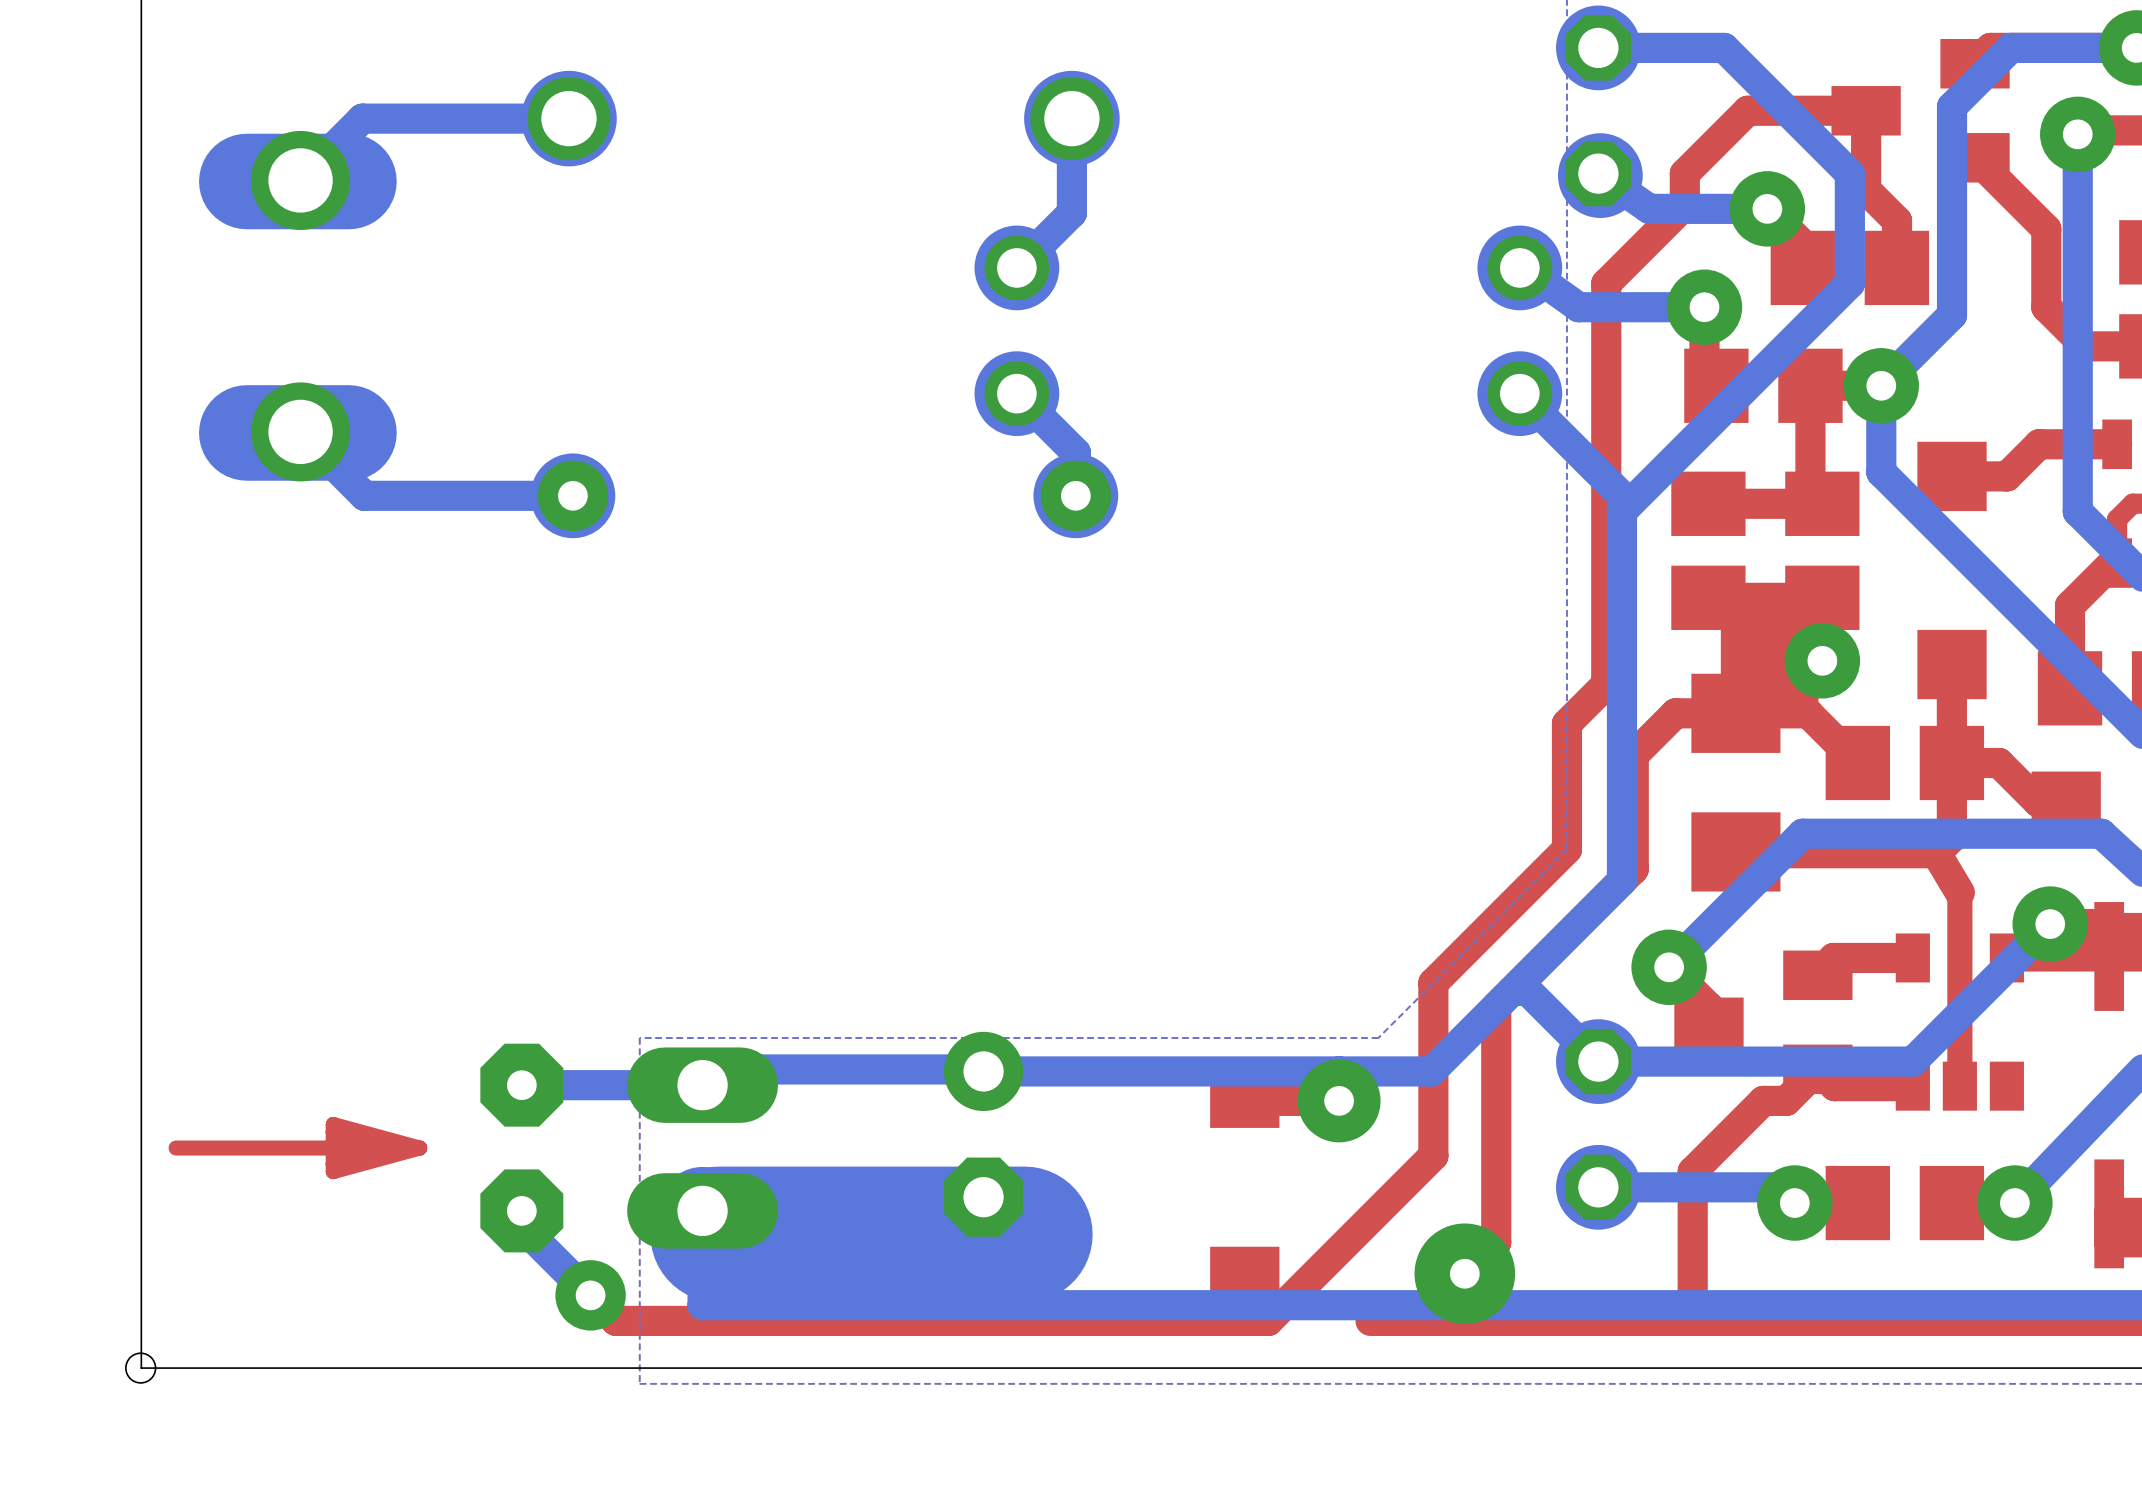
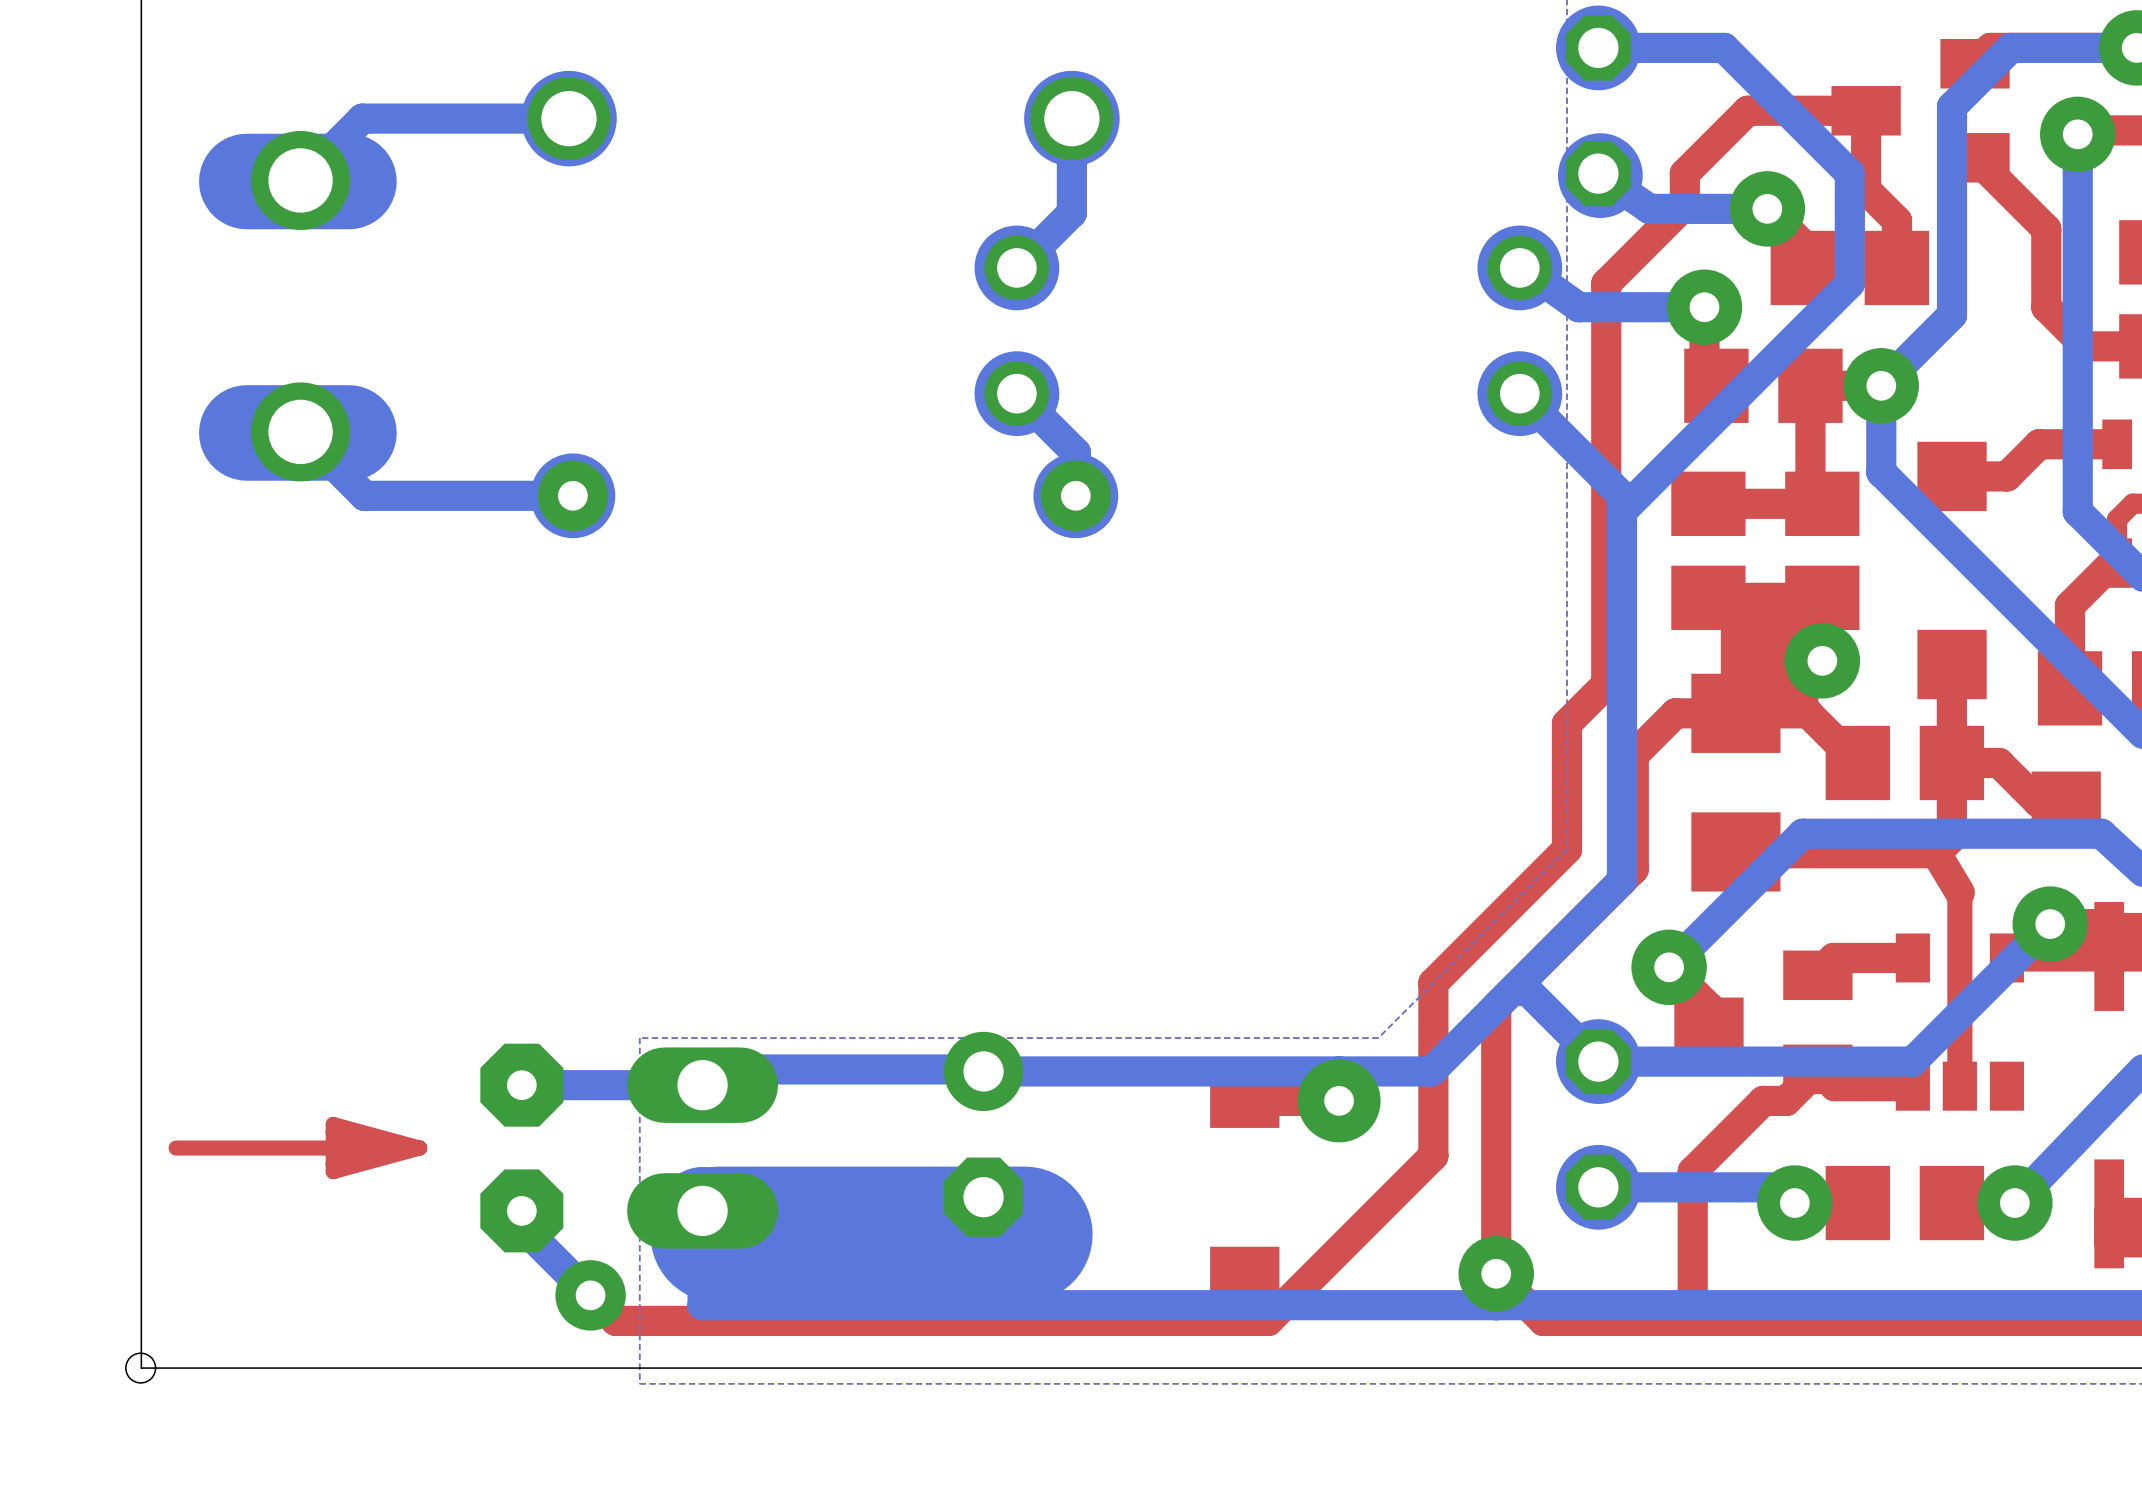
via size: [1414, 1223, 1516, 1325] -> [1458, 1236, 1534, 1312]
top track: (1543, 1320) (1370, 1320) -> none

